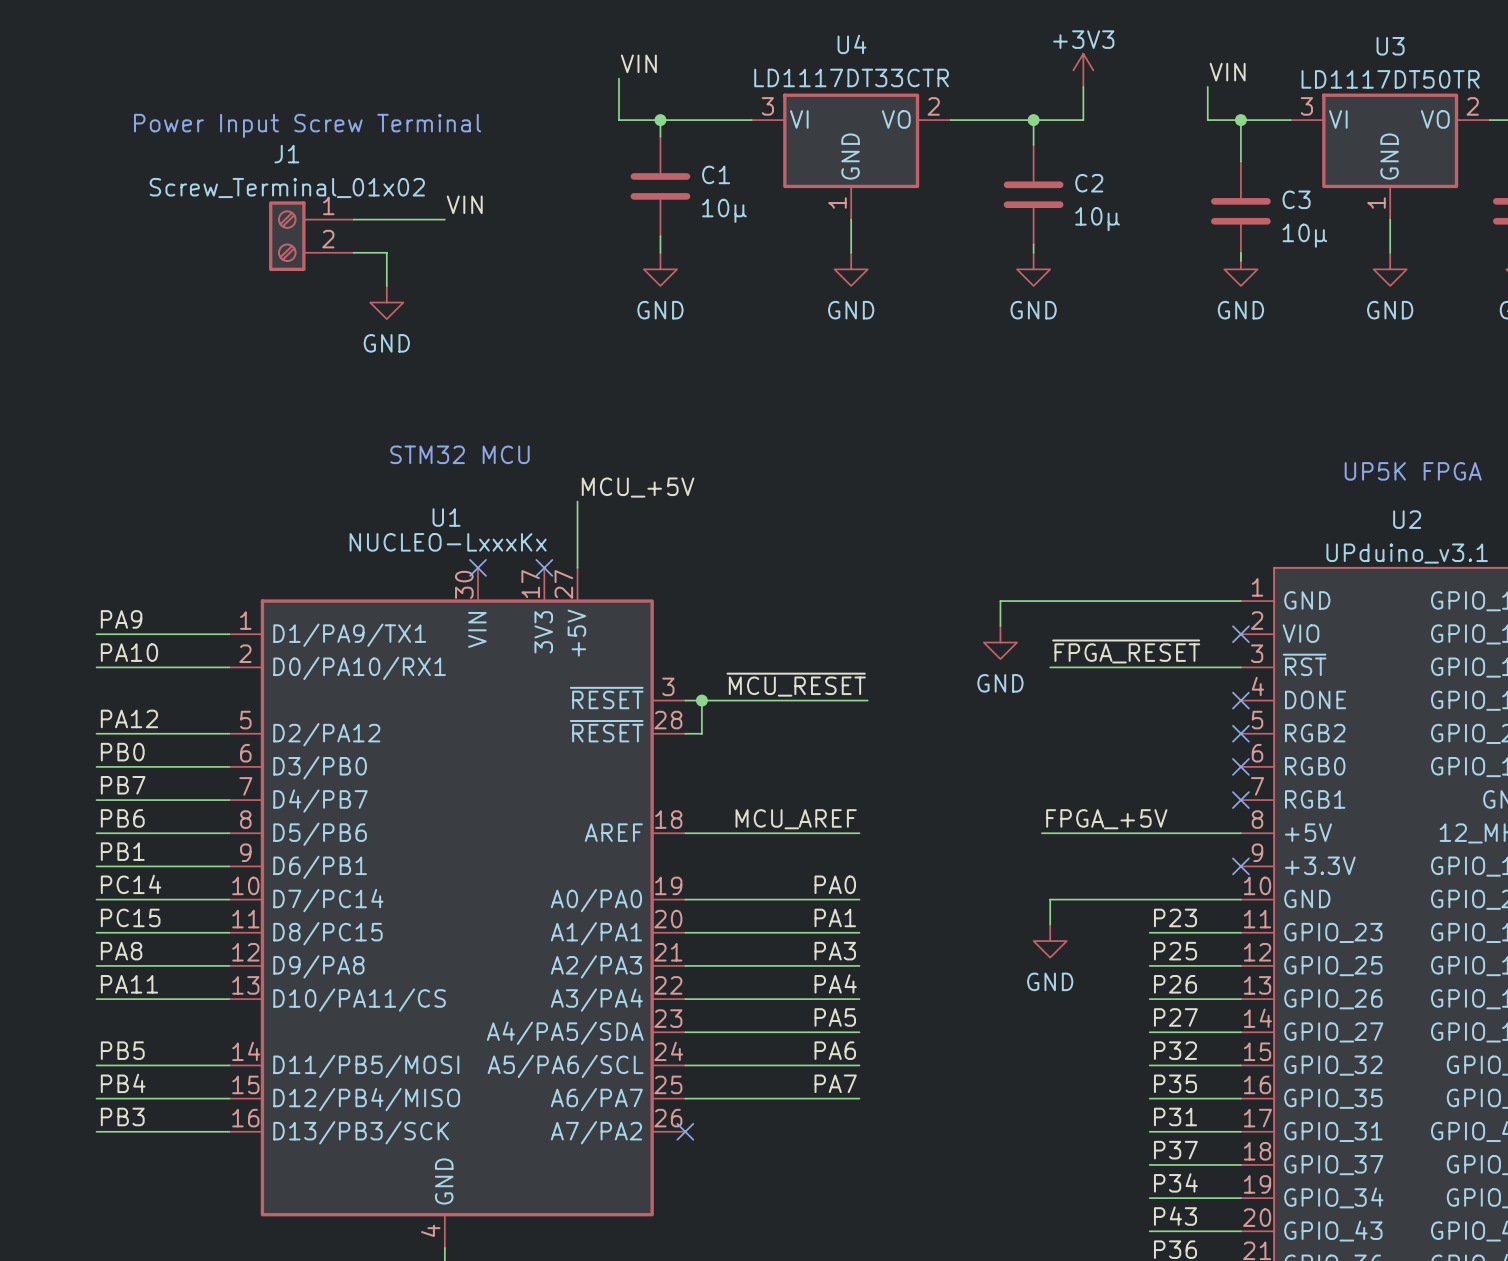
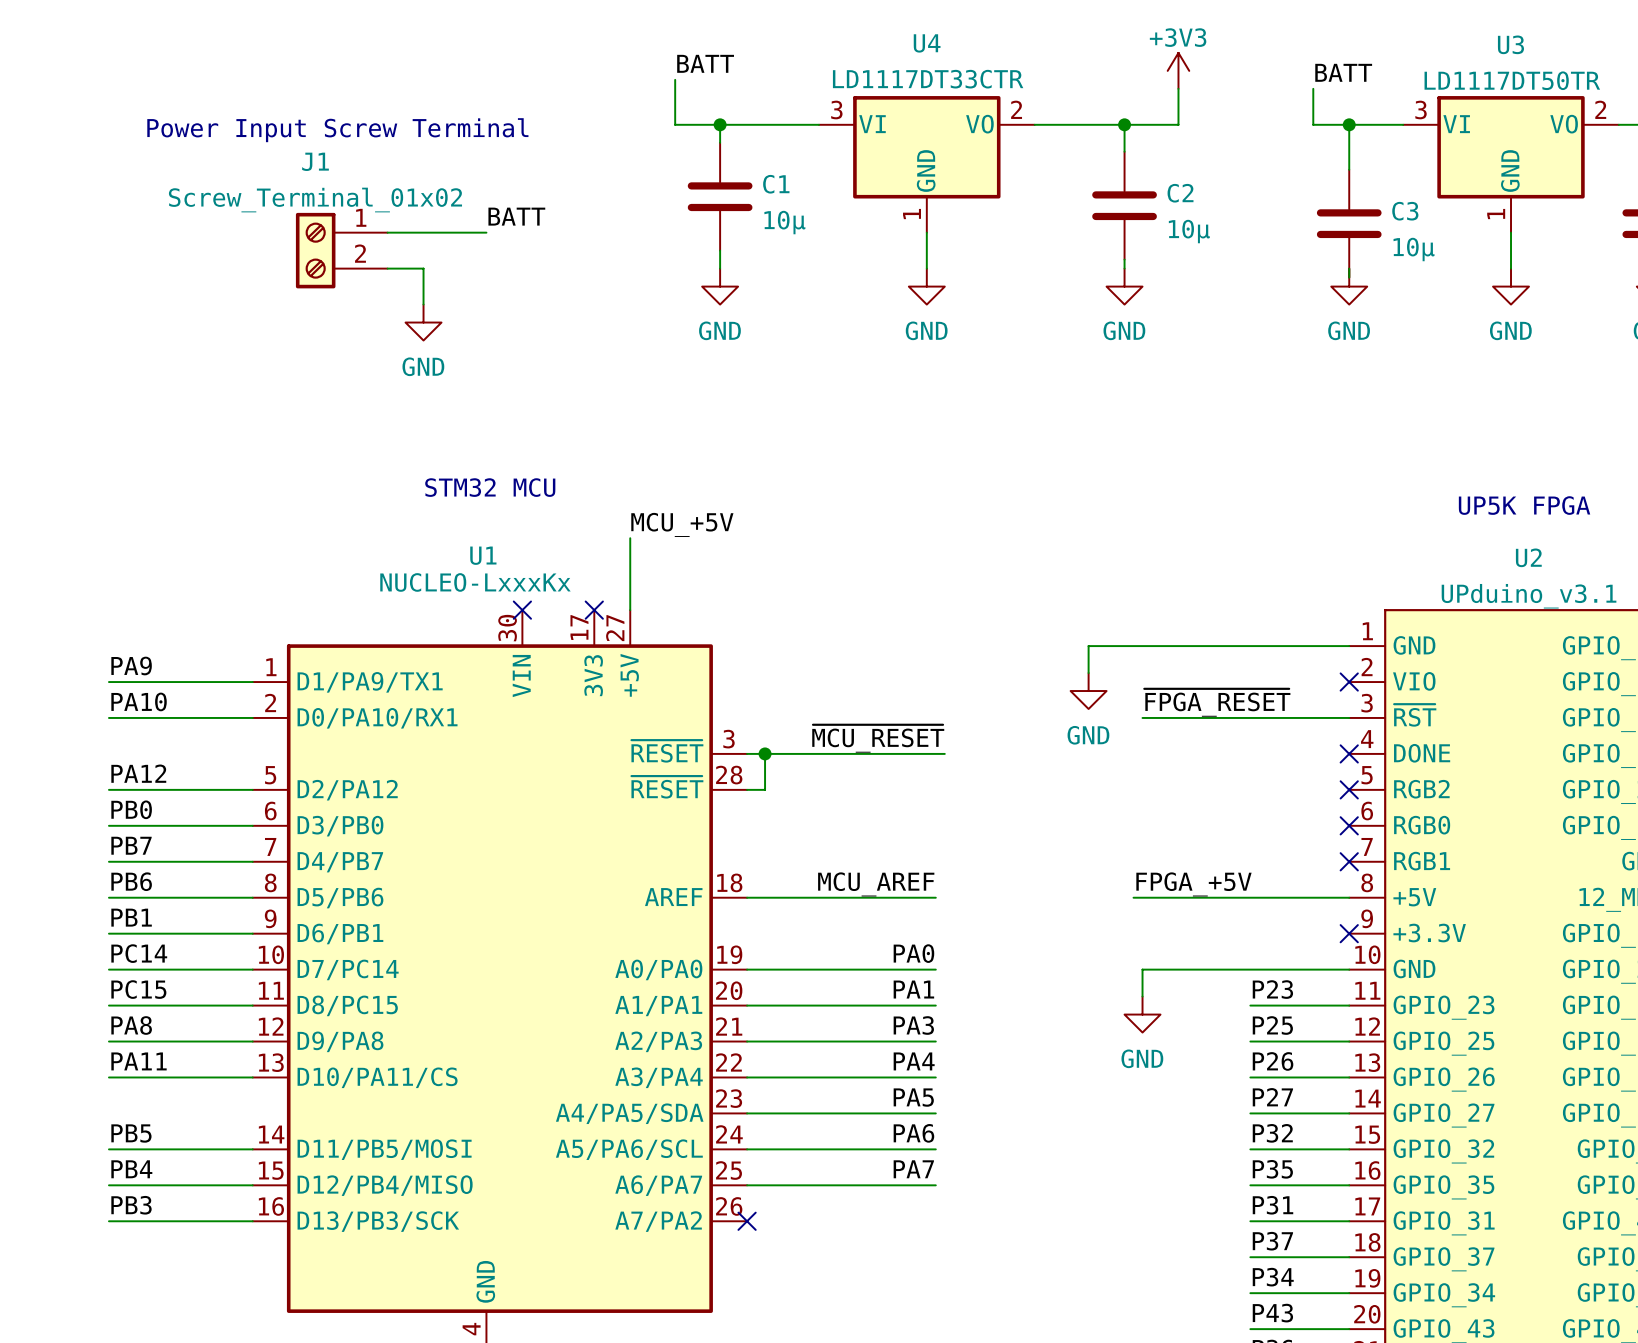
label: VIN (638, 63) -> BATT (705, 63)
label: VIN (1227, 72) -> BATT (1343, 72)
label: VIN (464, 204) -> BATT (516, 216)

